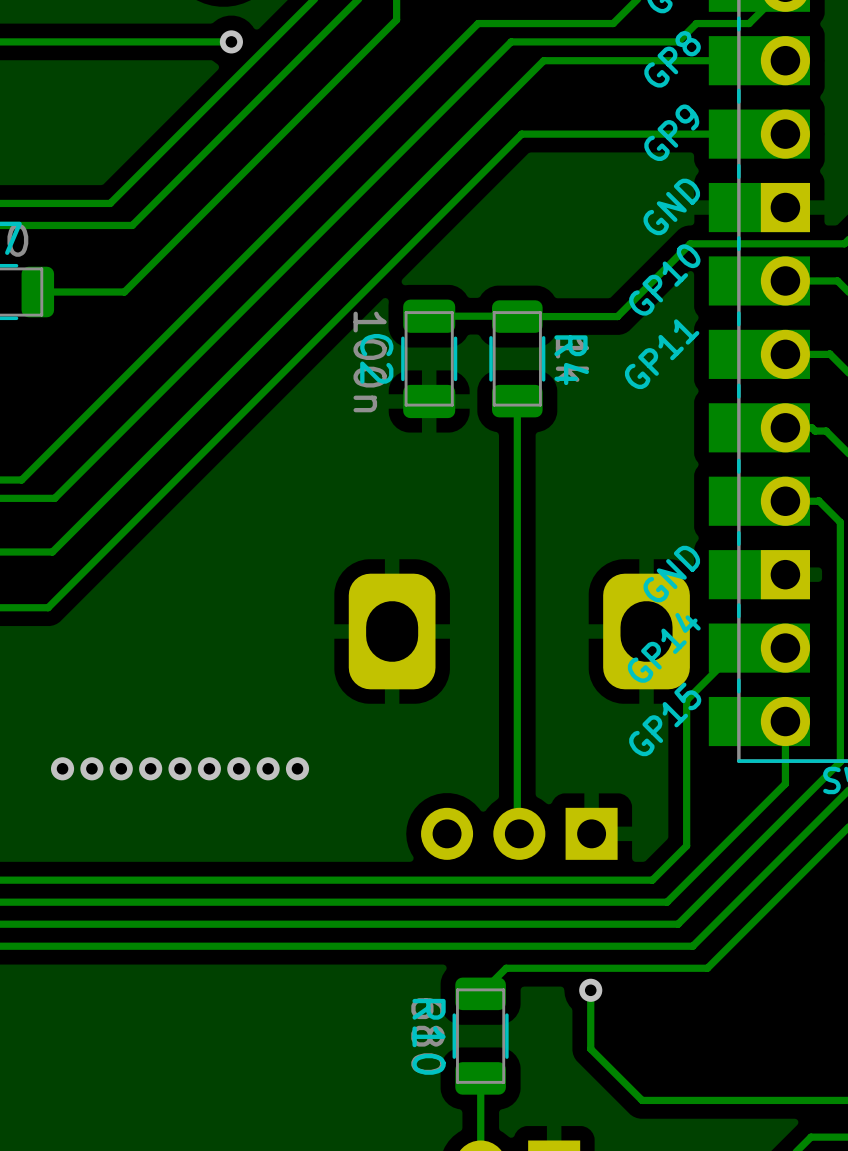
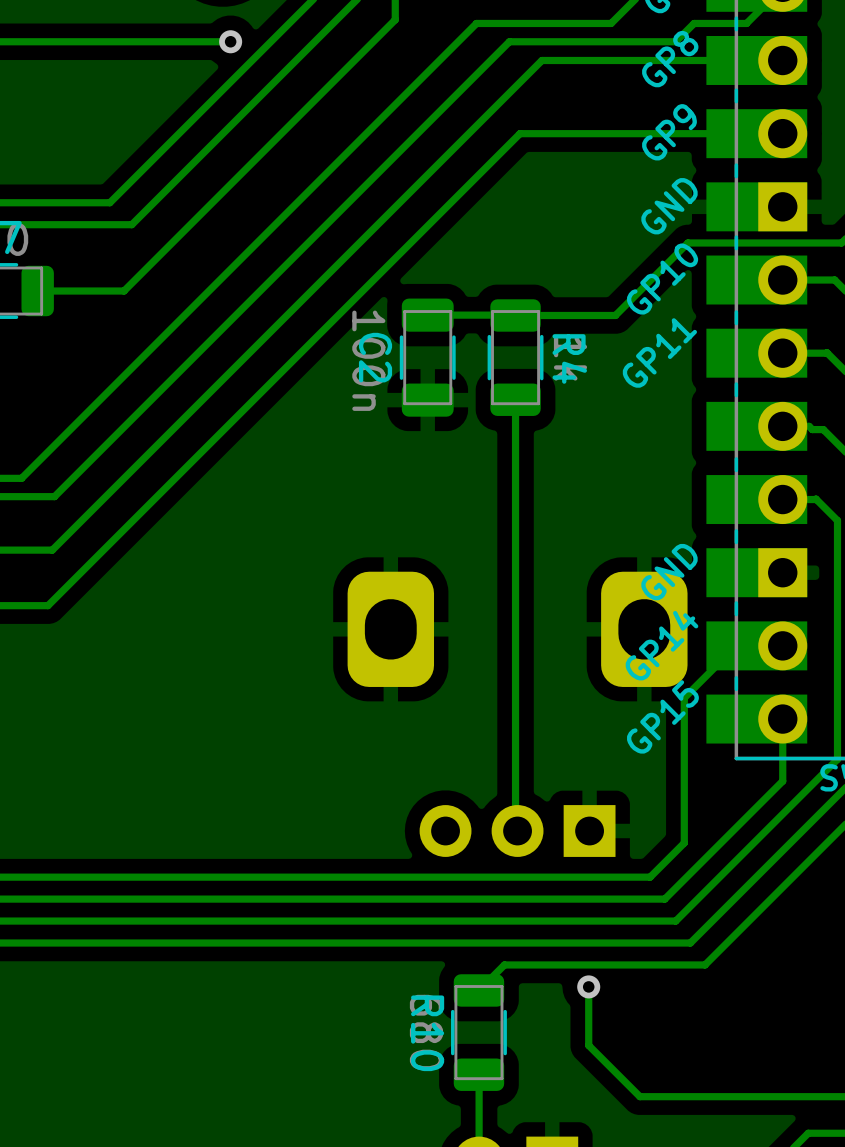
via: (62, 768) -> none
via: (91, 768) -> none
via: (121, 768) -> none
via: (150, 768) -> none
via: (180, 768) -> none
via: (209, 768) -> none
via: (238, 768) -> none
via: (268, 768) -> none
via: (297, 768) -> none

